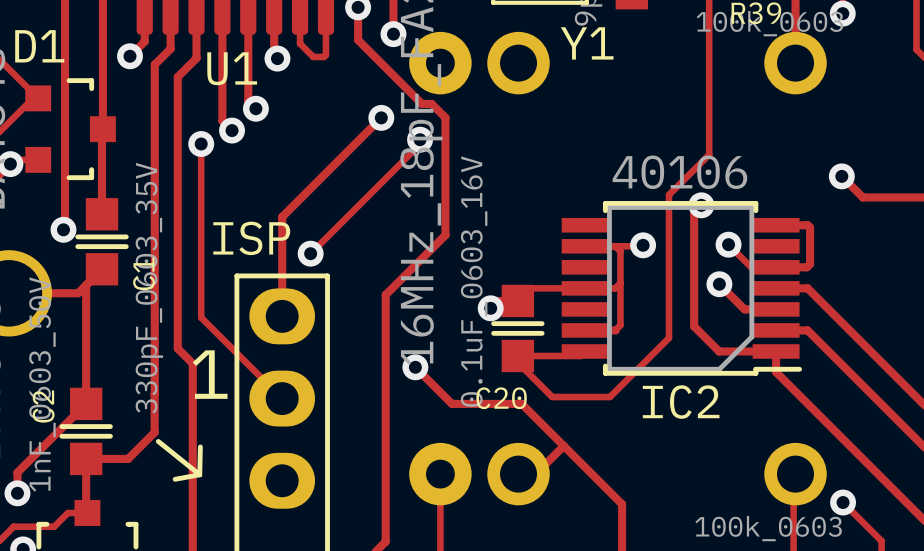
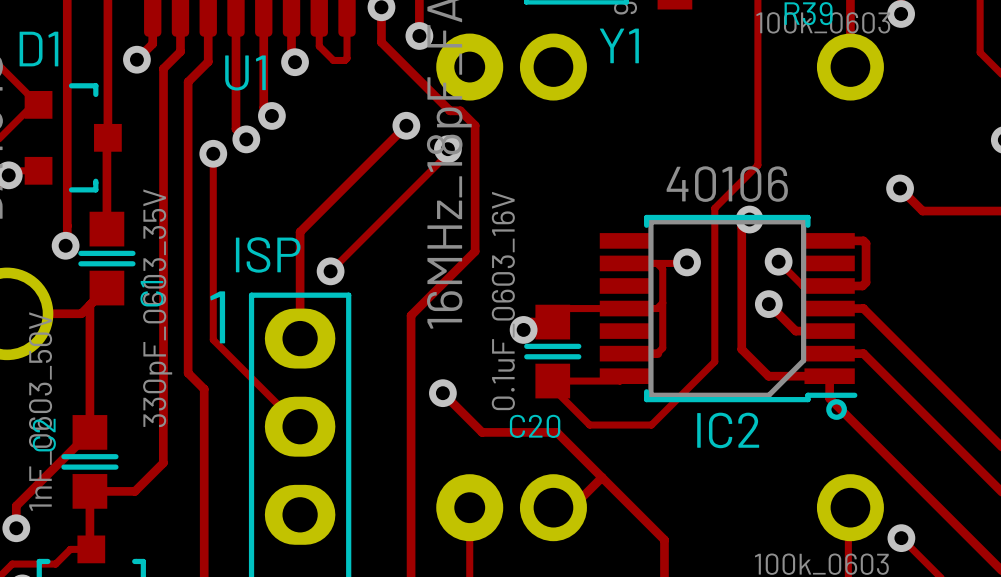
drawing: none -> [826, 399, 847, 420]
part text position: 1 (210, 374) -> 1 (217, 317)
line: (158, 441) (199, 474) -> none
line: (200, 446) (199, 474) -> none
line: (199, 474) (175, 479) -> none

